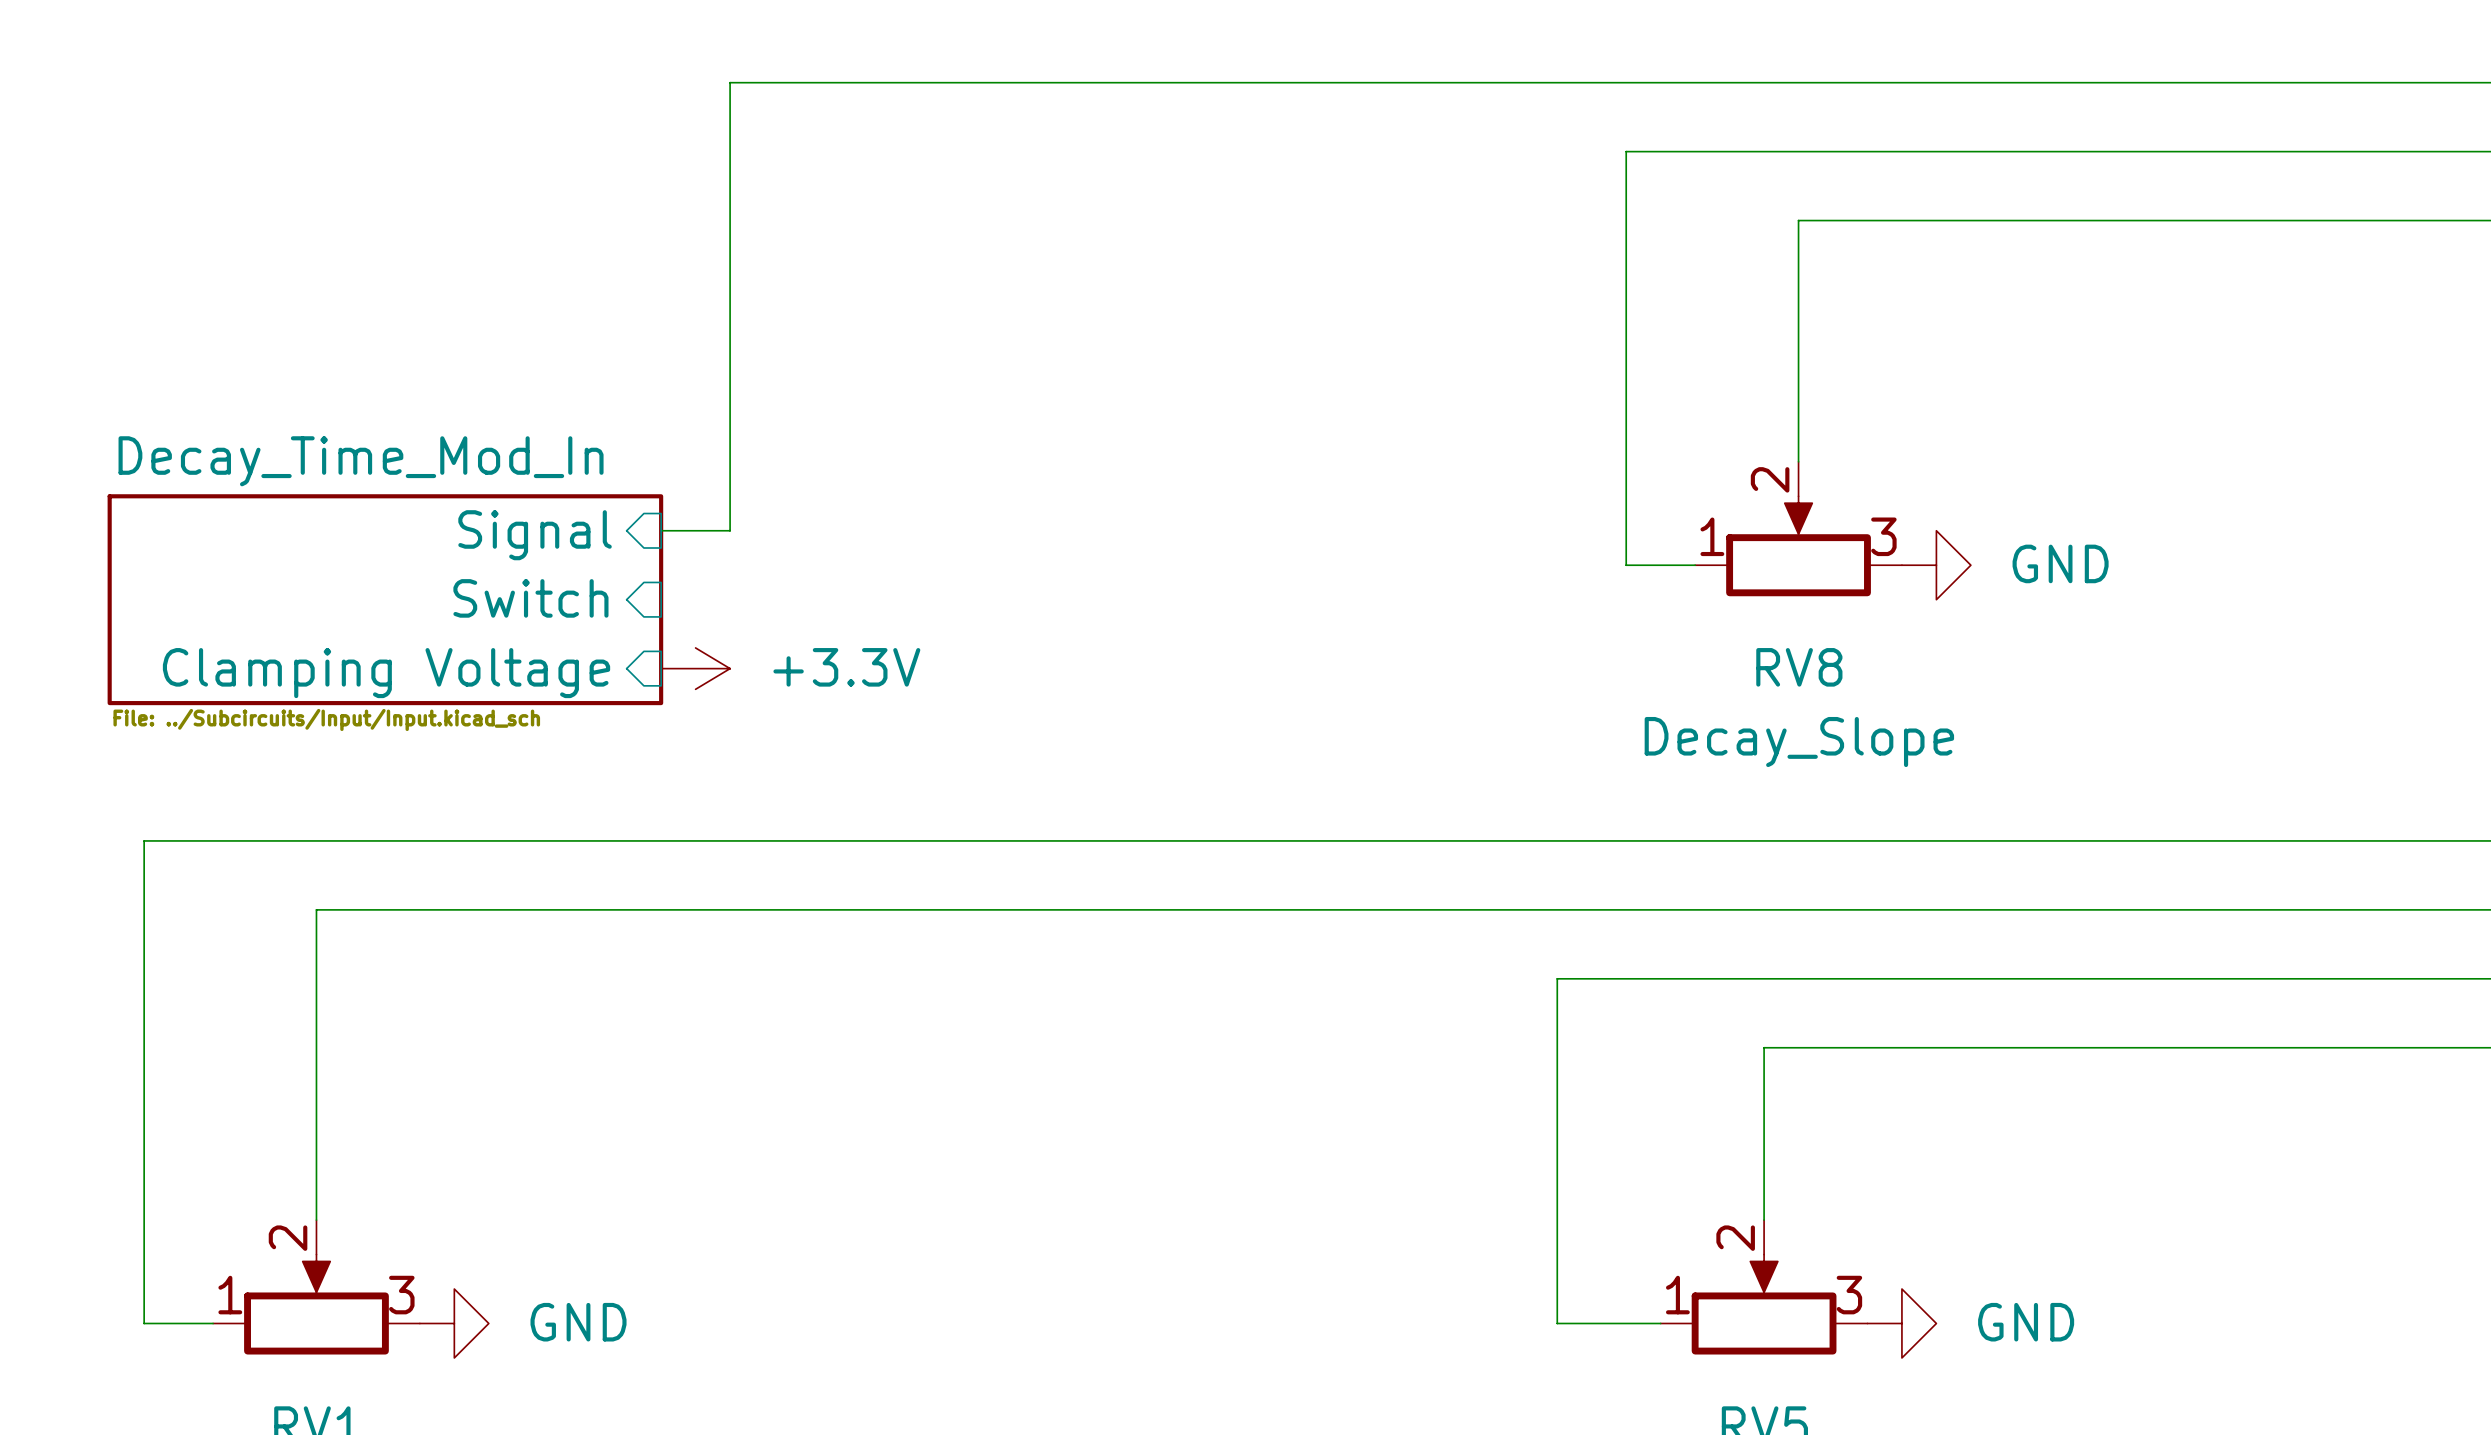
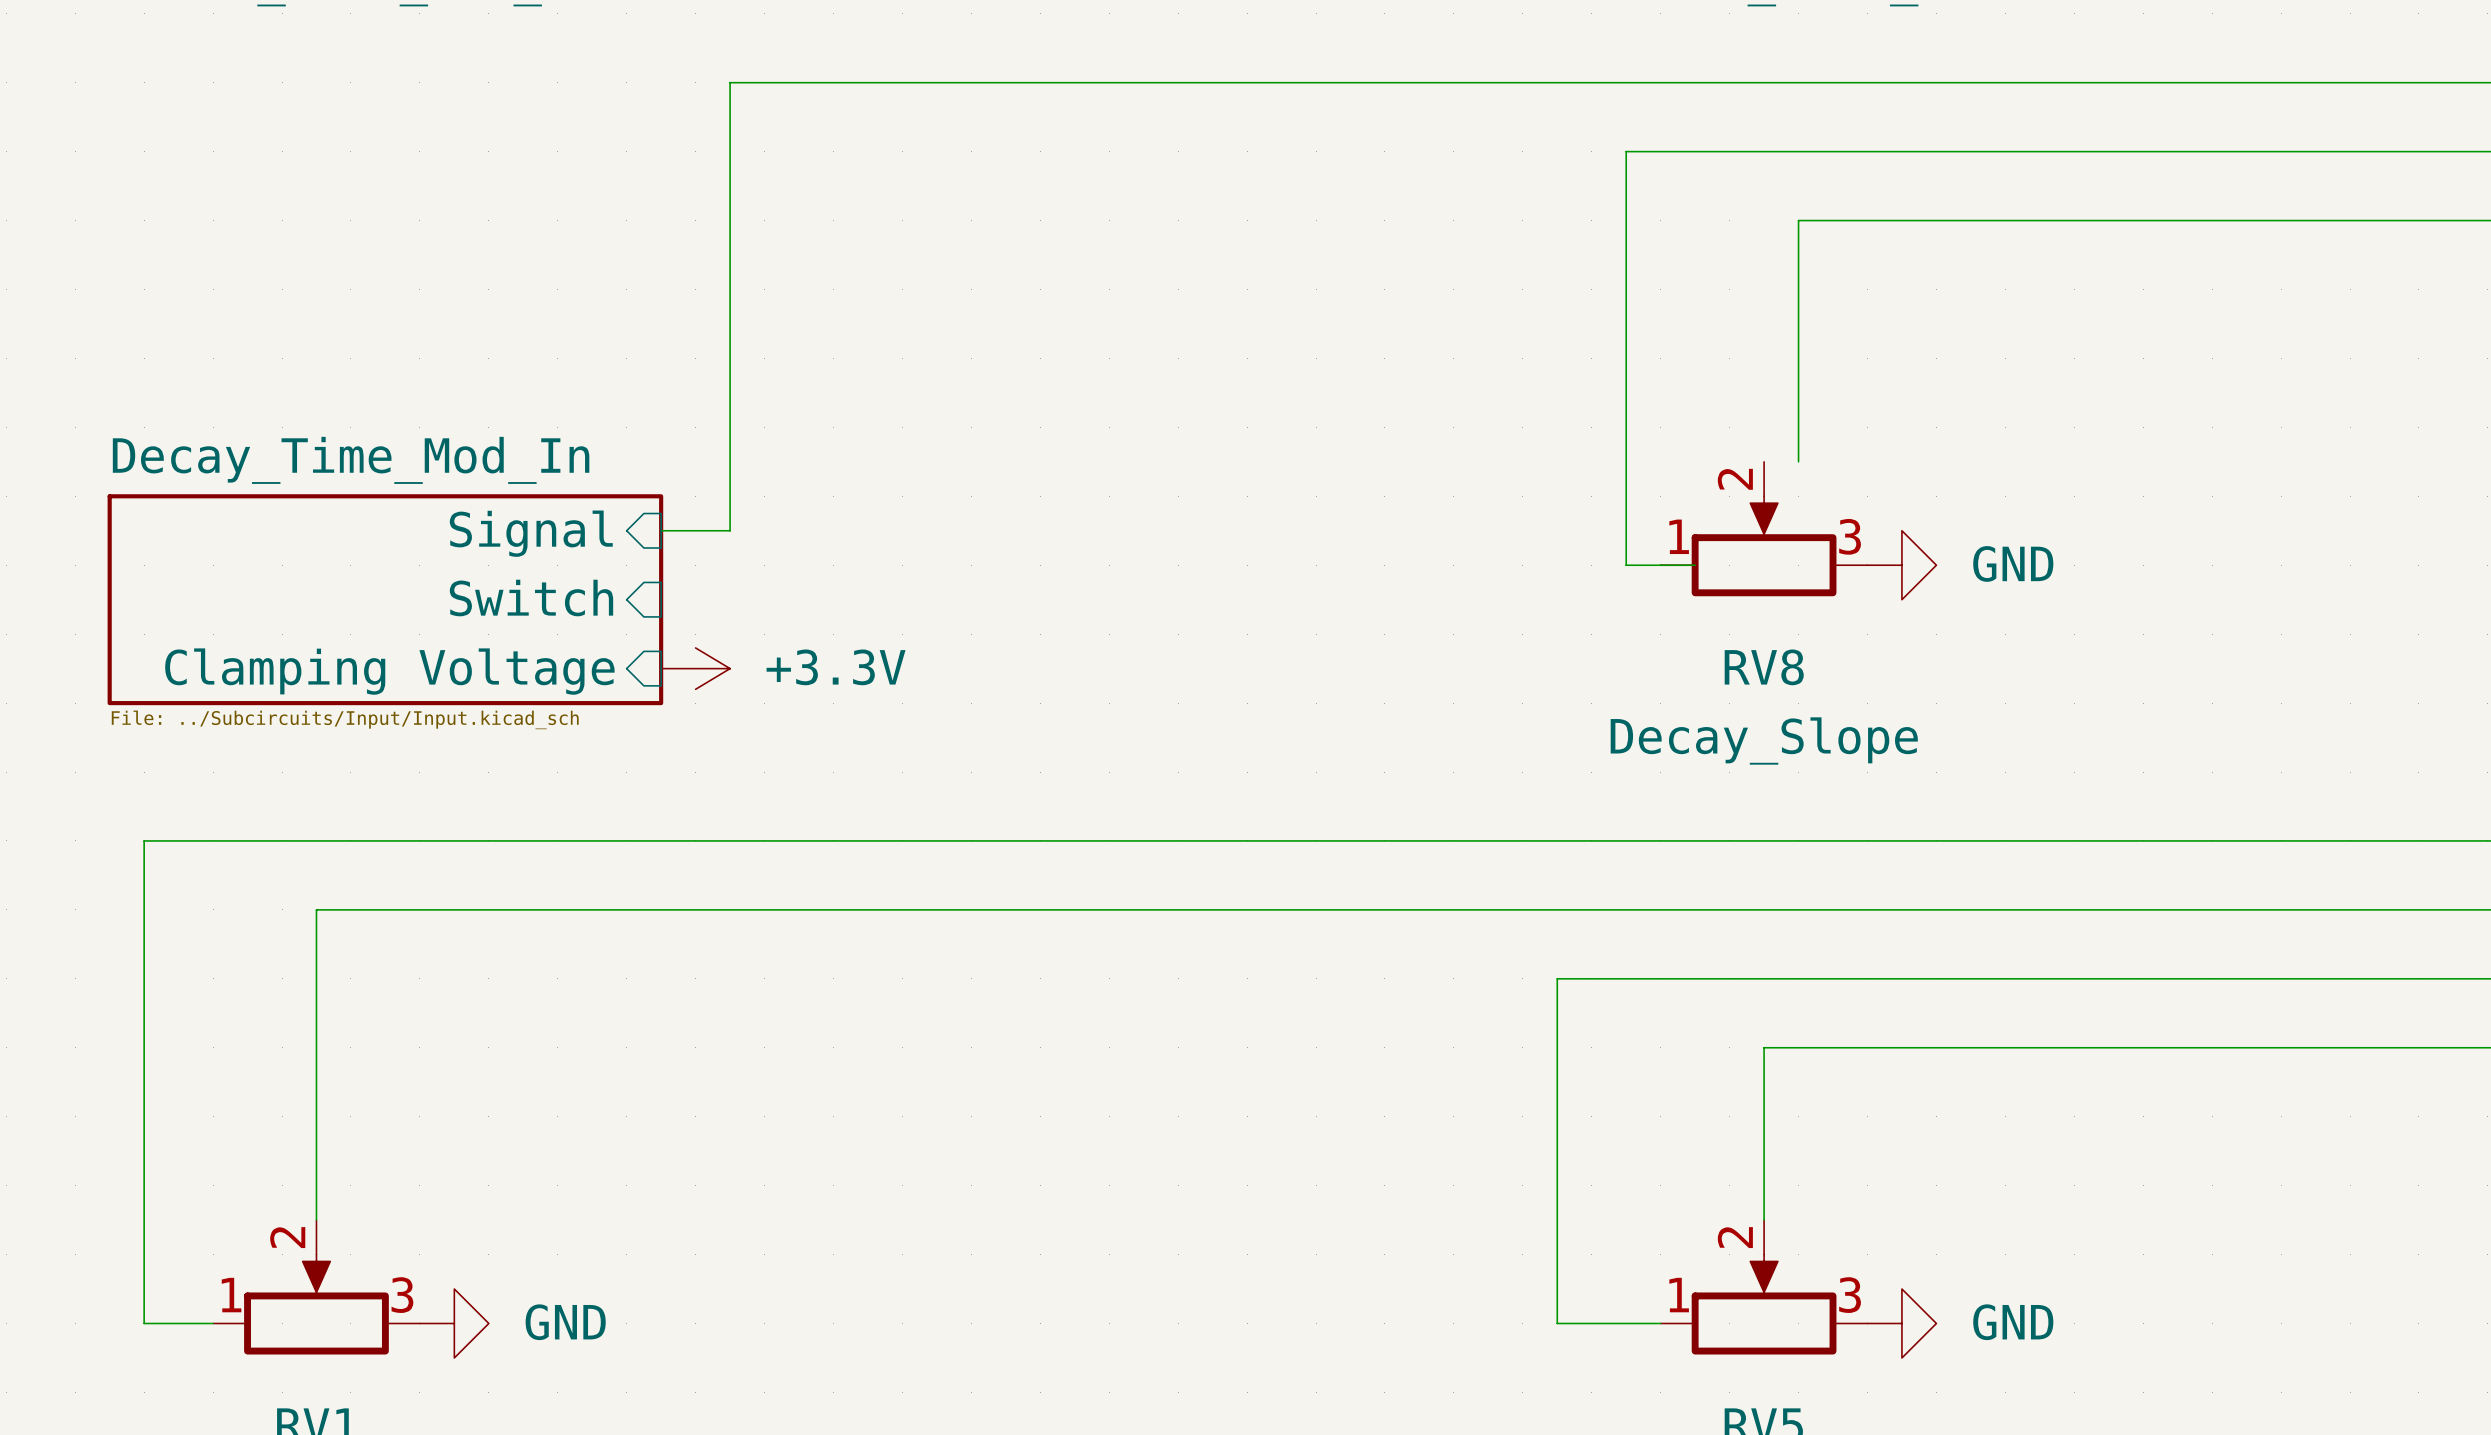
RV8 position: (1798, 529) -> (1764, 529)
power symbol position: GND (1936, 565) -> GND (1901, 565)

